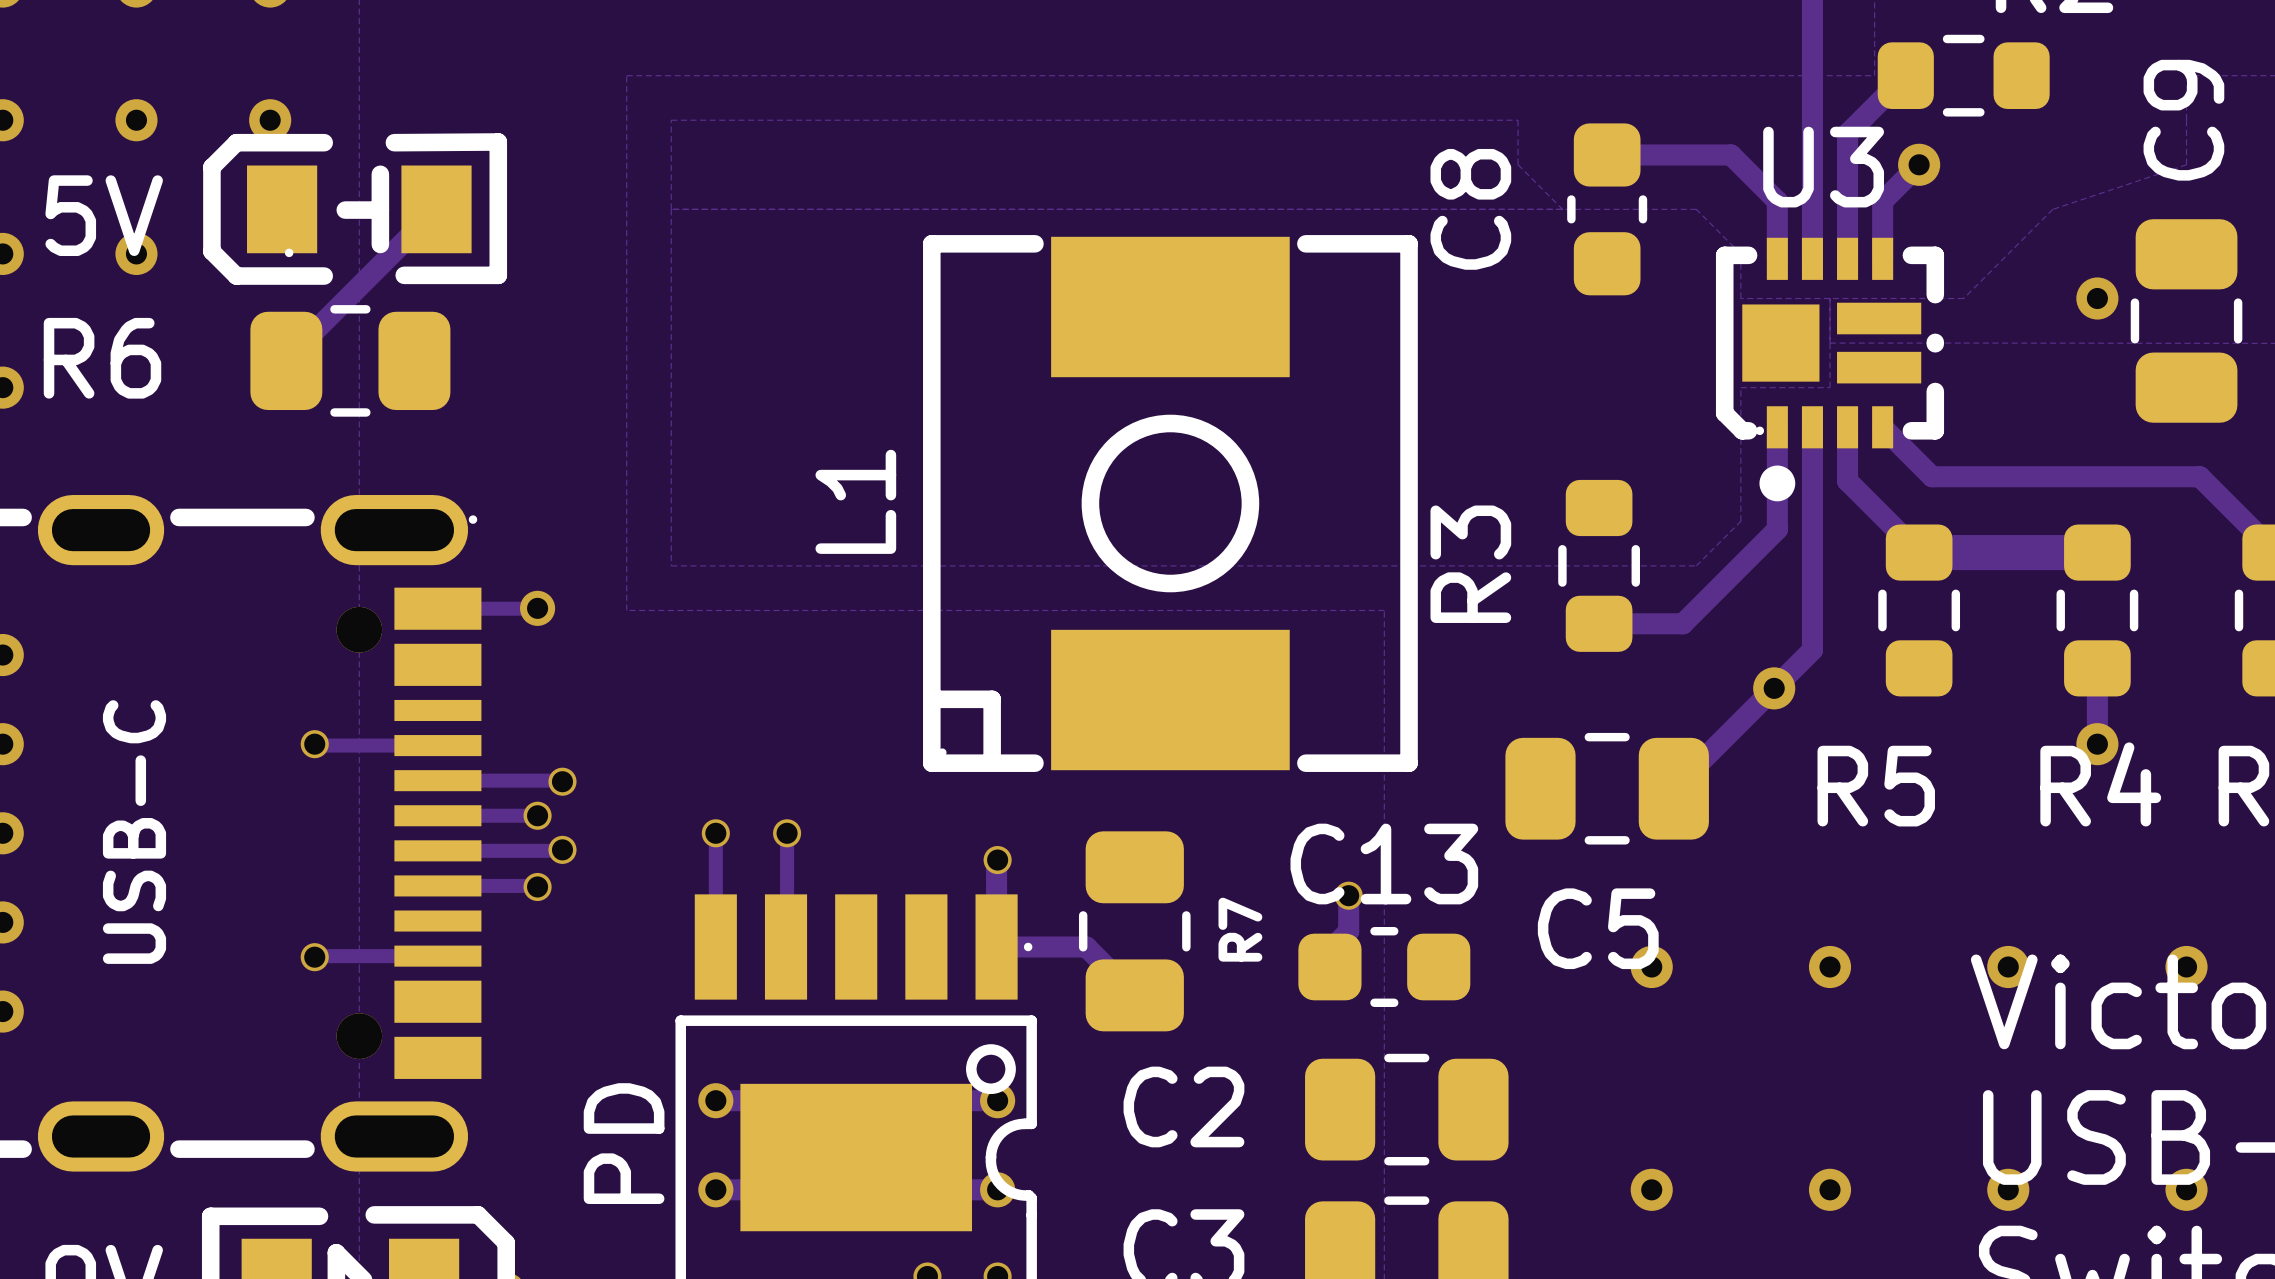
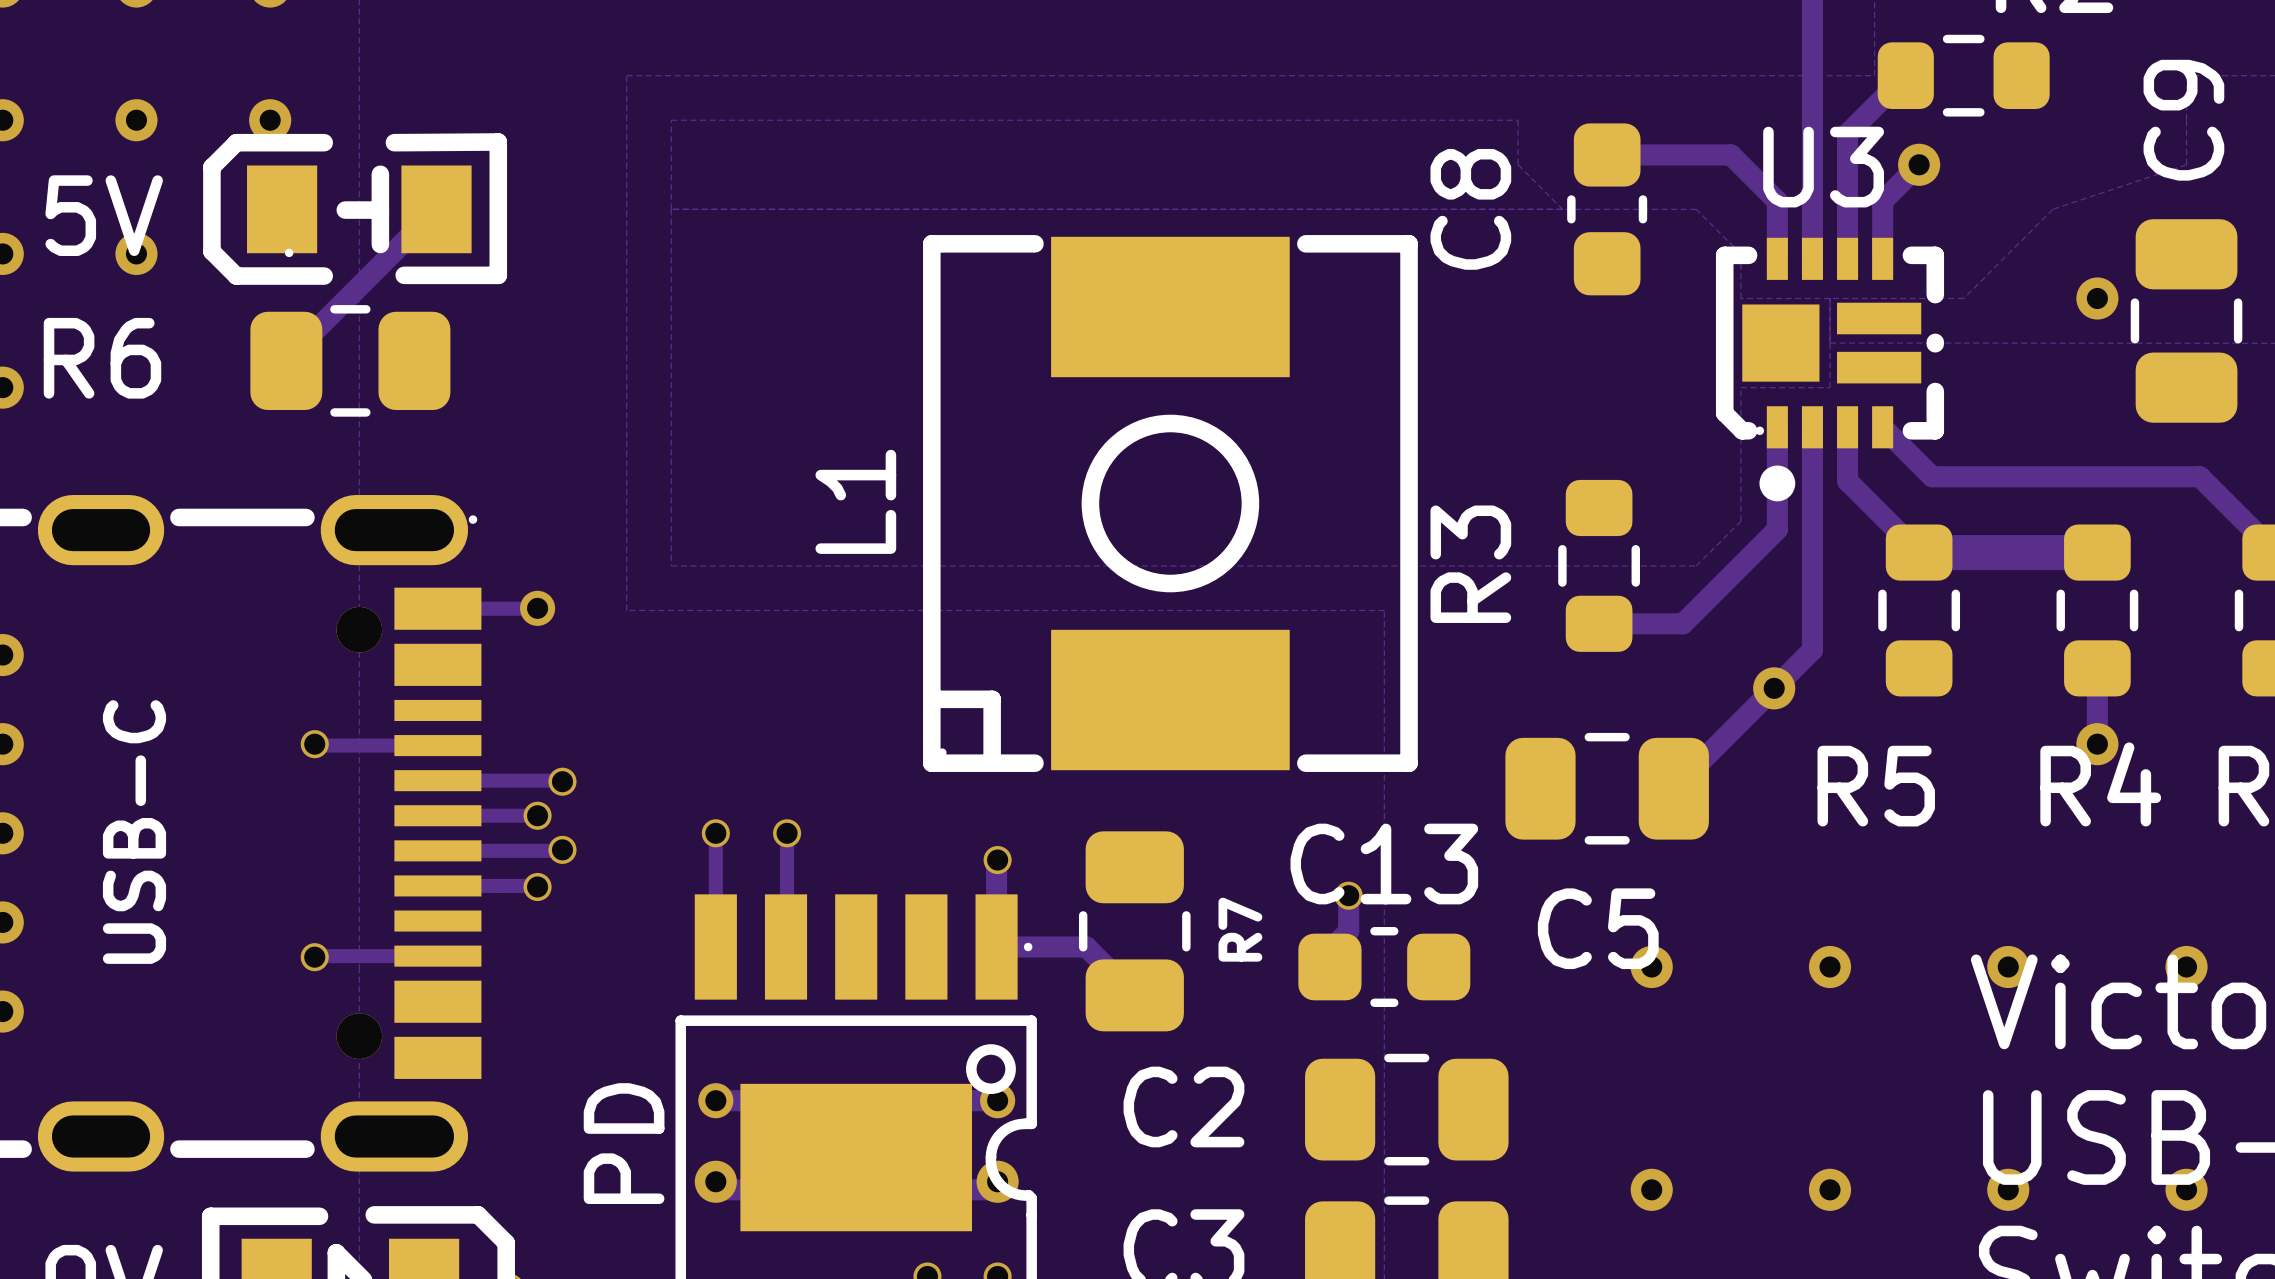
via size: [698, 1172, 734, 1208] -> [694, 1160, 737, 1203]
via size: [980, 1172, 1016, 1208] -> [976, 1160, 1019, 1203]

